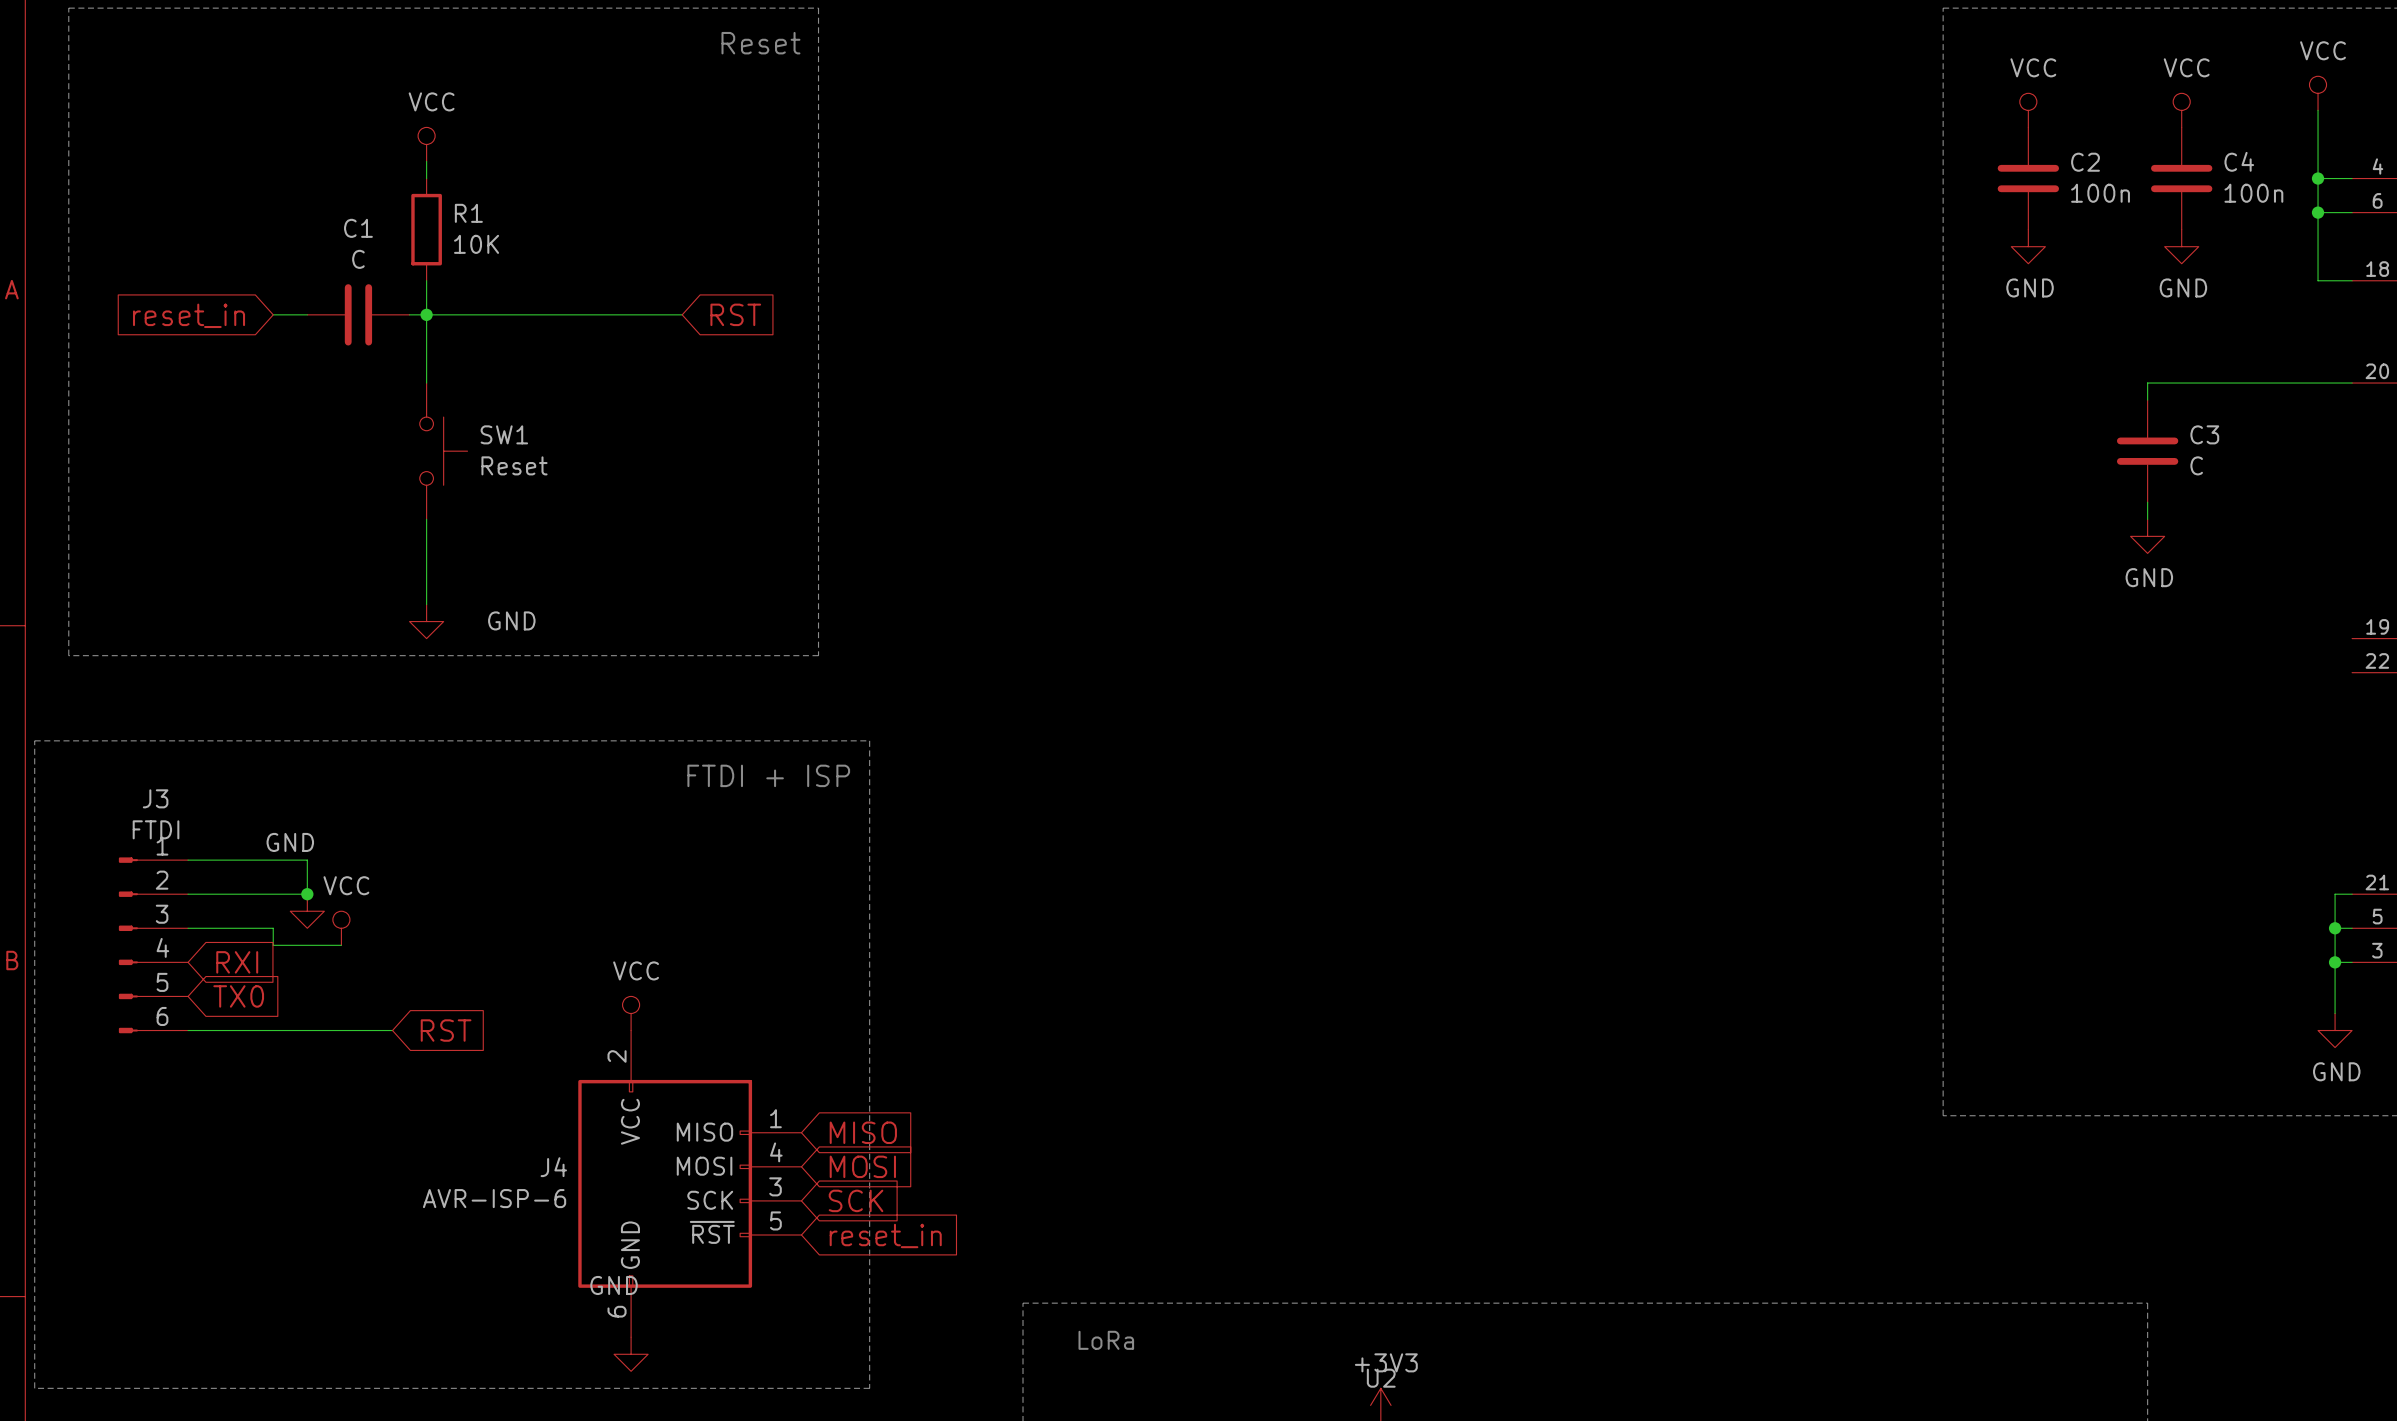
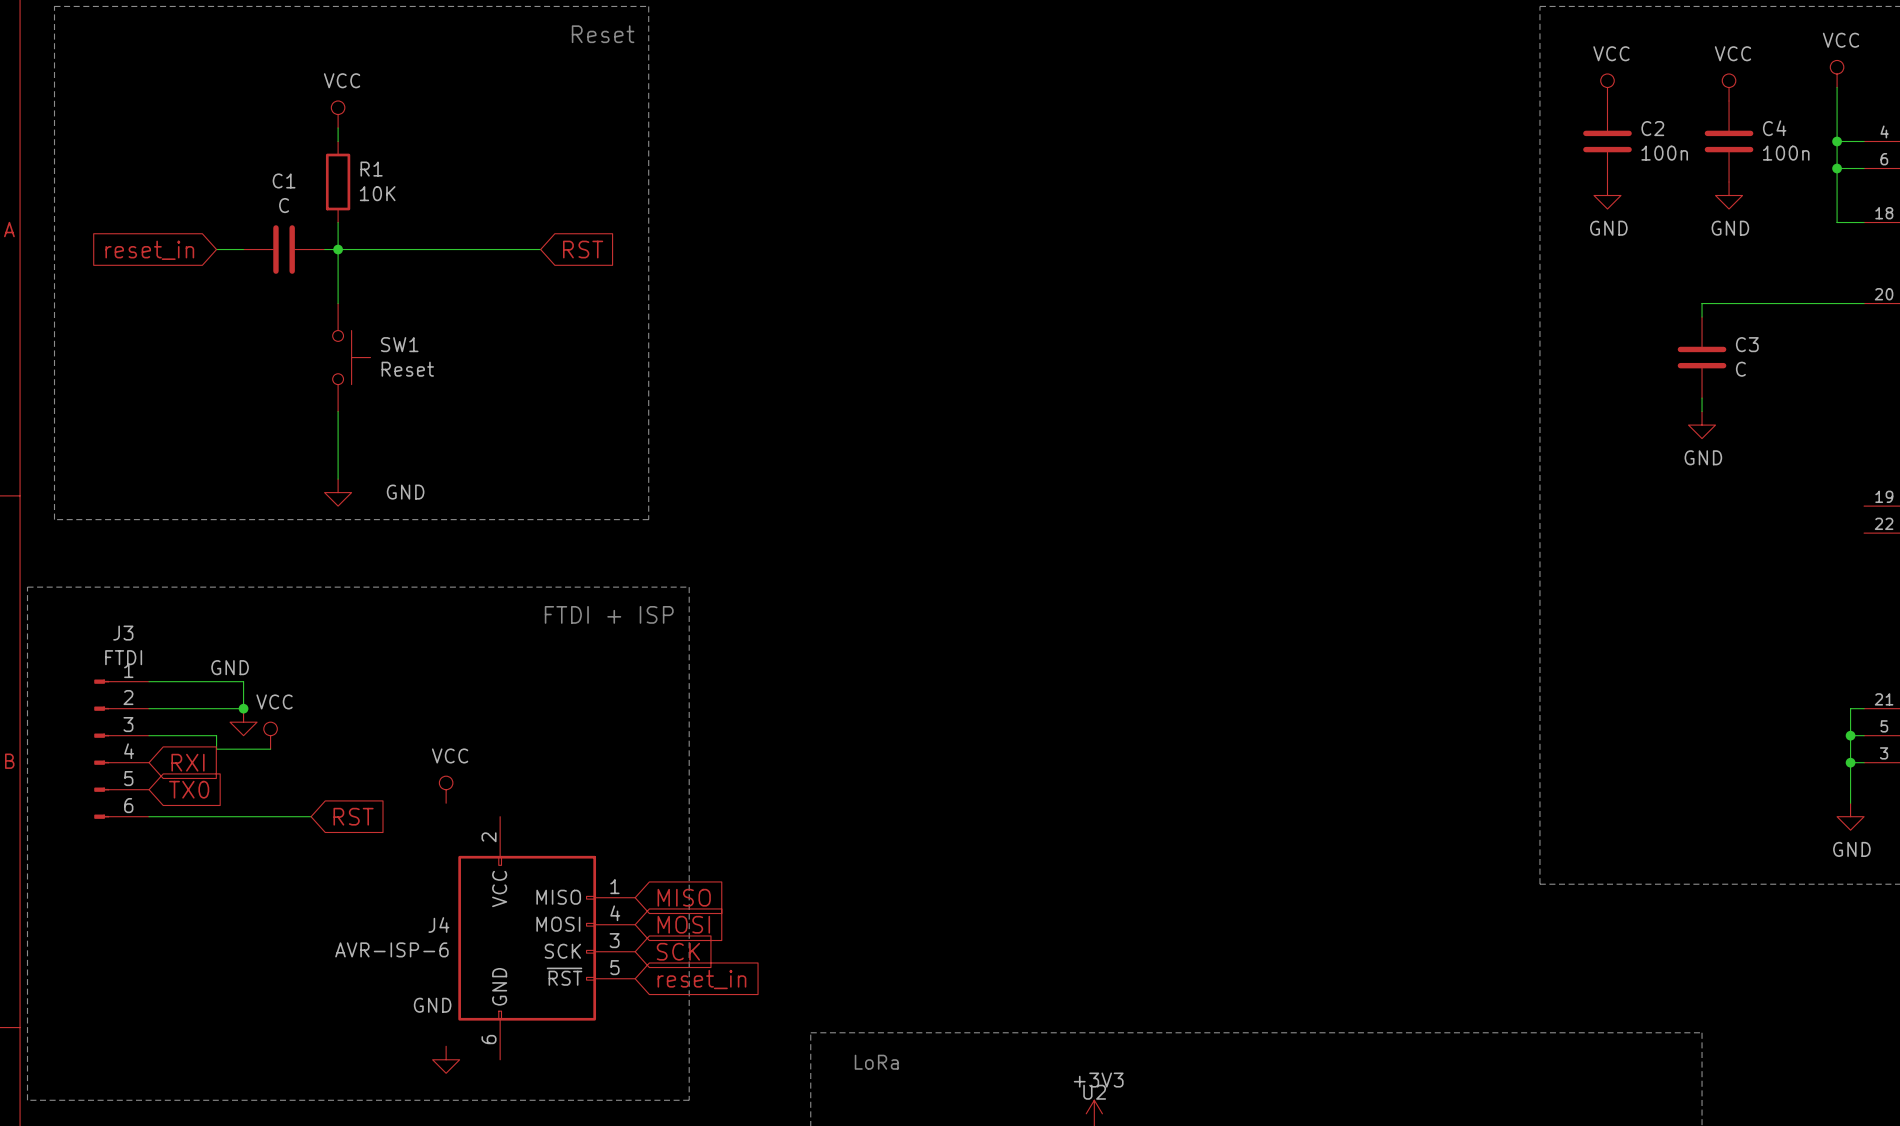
power symbol position: VCC (631, 1013) -> VCC (446, 789)
power symbol position: GND (631, 1354) -> GND (446, 1059)

